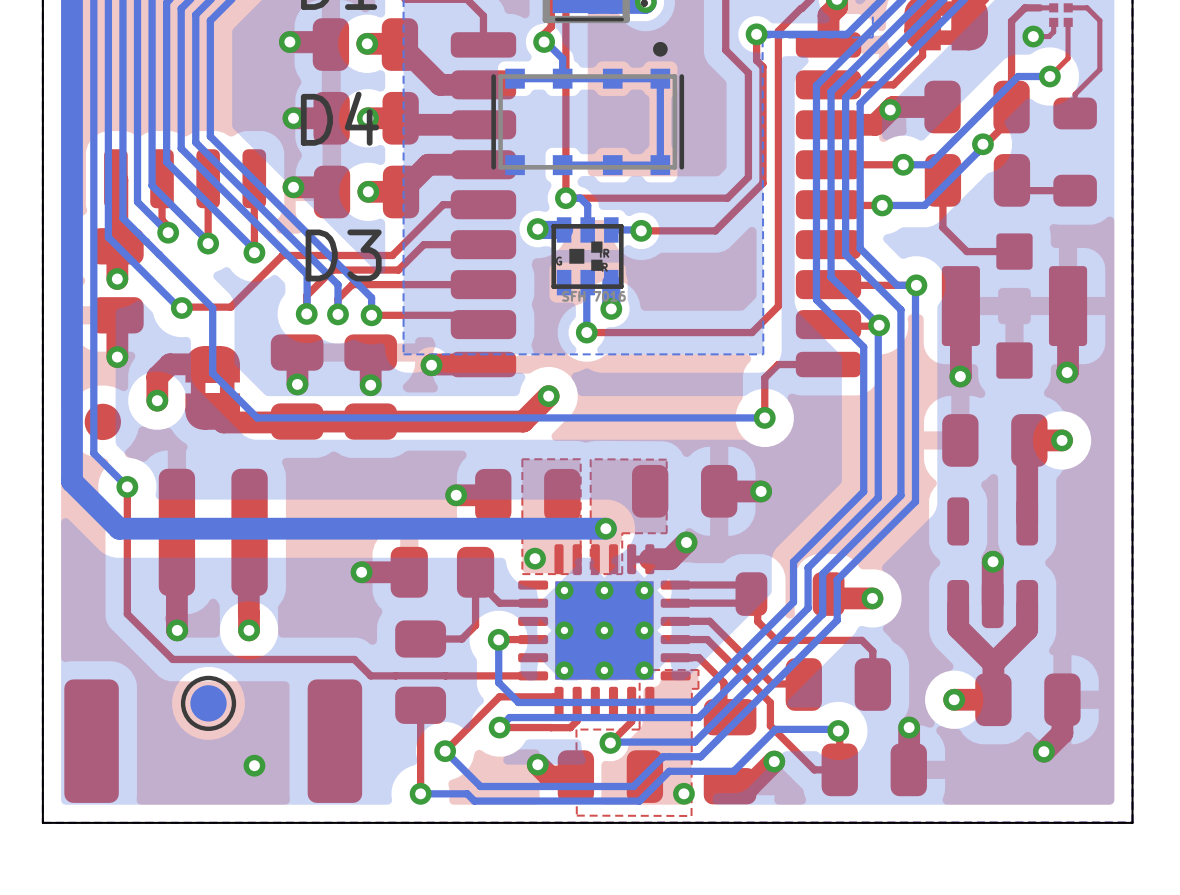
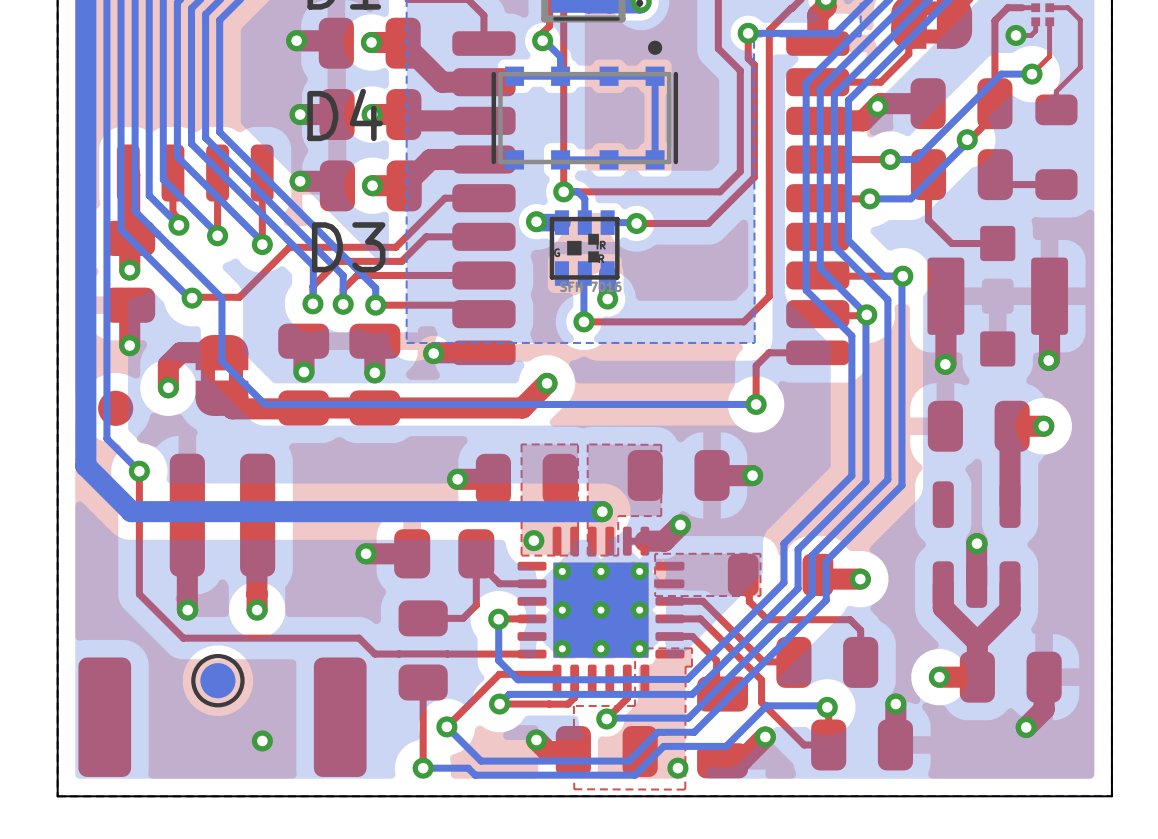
top zone outline: none -> (760, 553) (760, 595) (655, 595) (655, 553) (760, 553)
top track: (755, 584) (691, 584) -> none
top track: (741, 603) (691, 603) -> none

